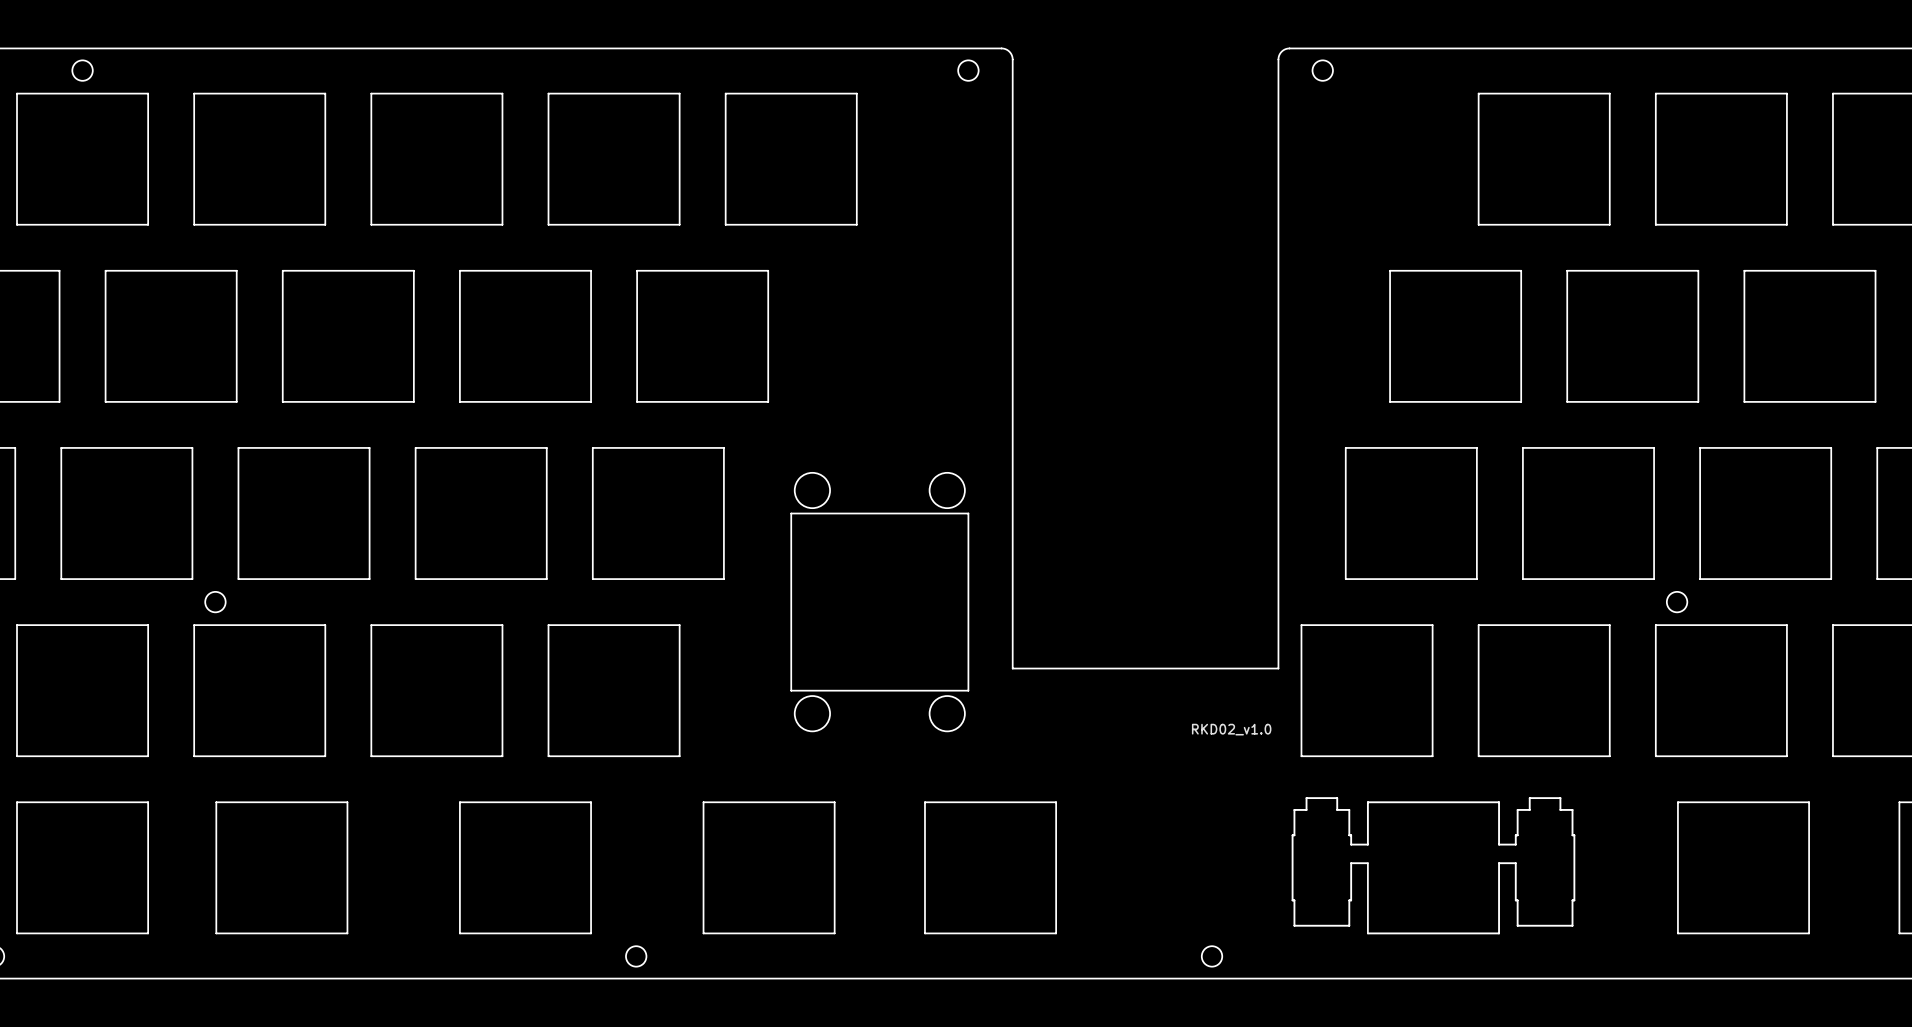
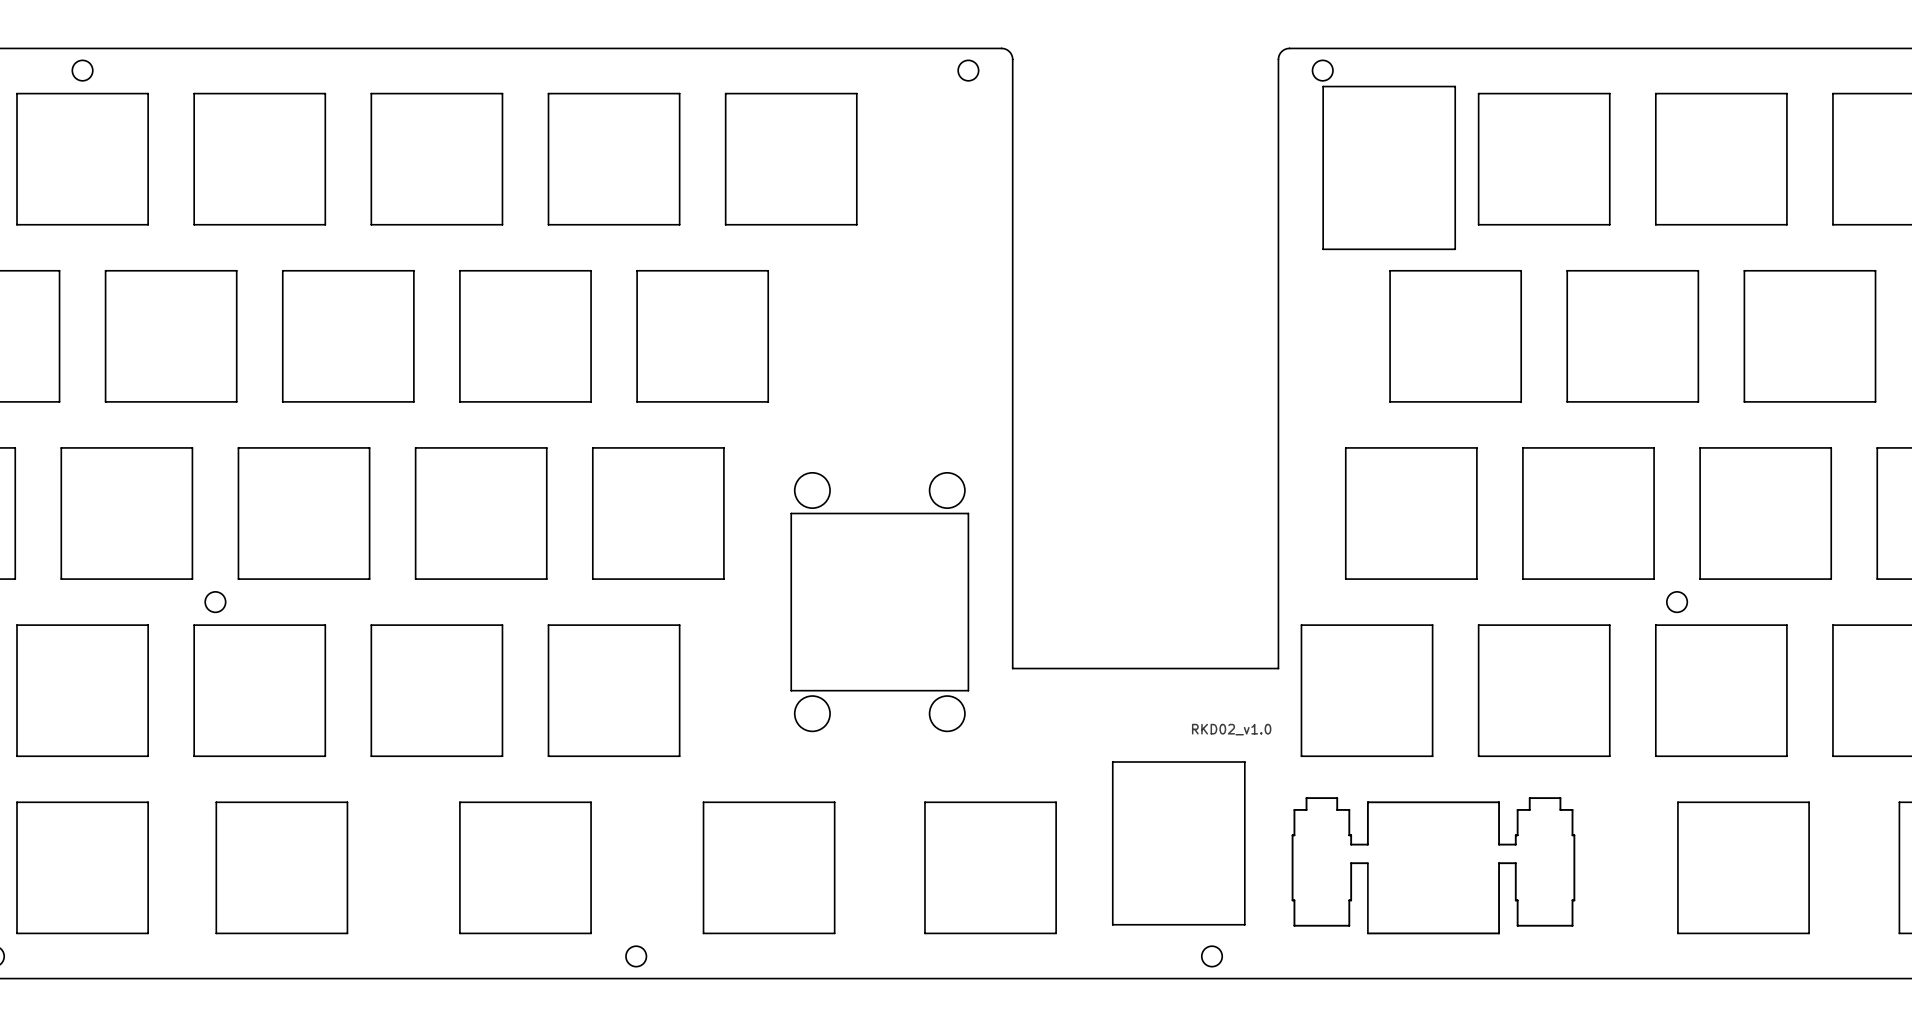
drawing: none -> [1322, 86, 1456, 250]
drawing: none -> [1112, 761, 1246, 926]

